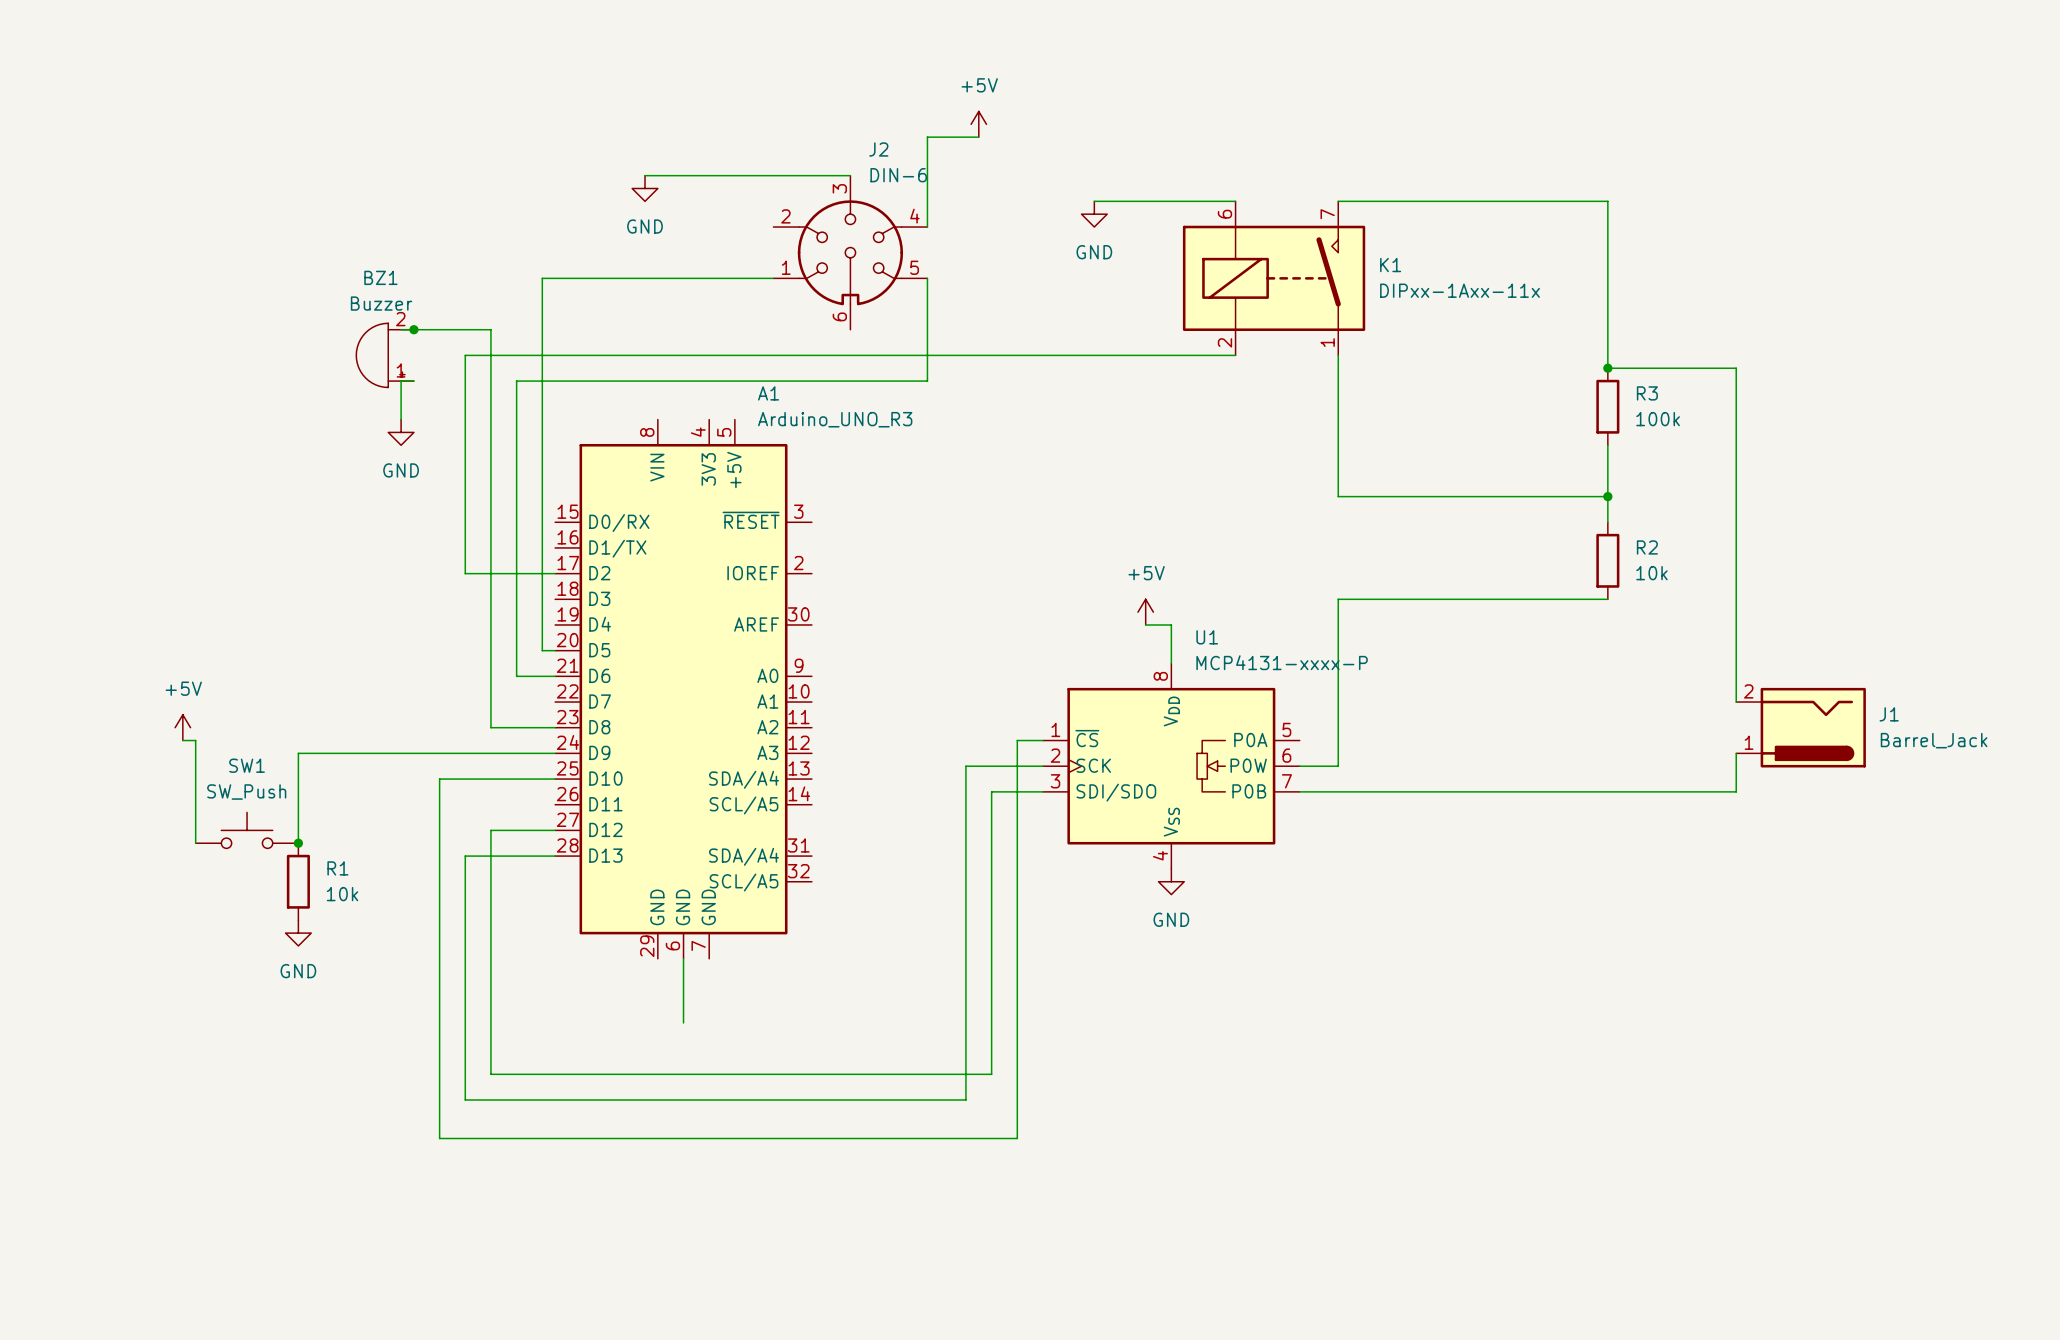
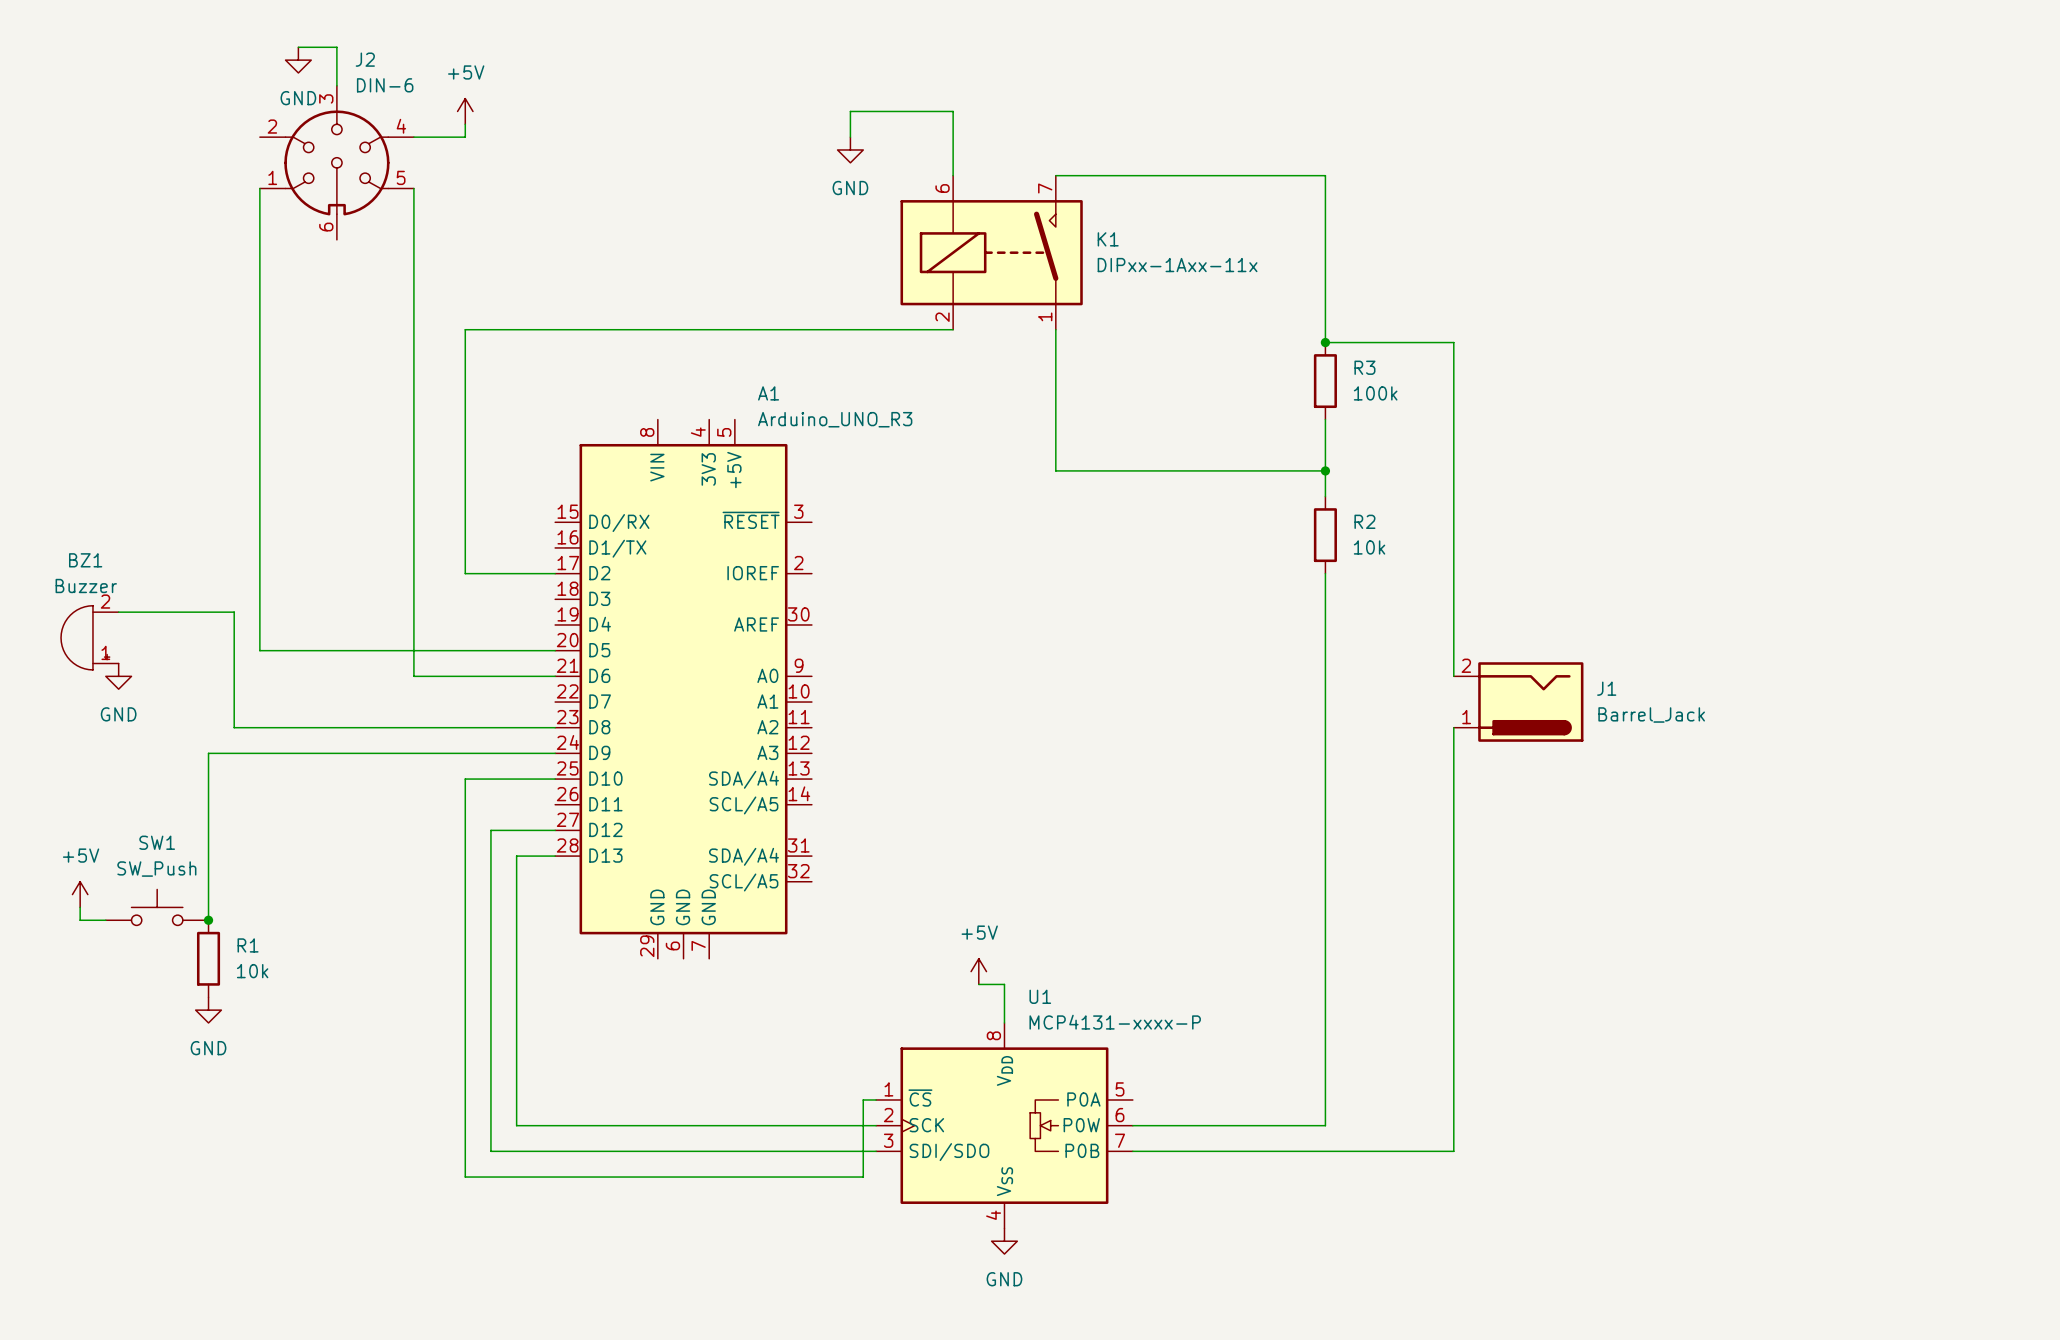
wire: none -> (298, 47) (336, 47) (336, 85)
power symbol: none -> GND (298, 60)
power symbol: none -> +5V (465, 111)
wire: none -> (465, 124) (465, 137) (413, 137)
power symbol: +5V (978, 124) -> none
wire: none -> (850, 137) (850, 111) (953, 111) (953, 175)
wire: (978, 137) (927, 137) (927, 227) -> none
power symbol: none -> GND (850, 149)
wire: (645, 175) (850, 175) -> none
wire: none -> (1055, 175) (1325, 175) (1325, 342) (1453, 342) (1453, 676)
power symbol: GND (645, 188) -> none
wire: (1094, 201) (1235, 201) -> none
wire: (1338, 201) (1607, 201) (1607, 368) (1736, 368) (1736, 702) -> none
power symbol: GND (1094, 214) -> none
J2 position: (850, 252) -> (336, 162)
wire: (773, 278) (542, 278) (542, 650) -> (259, 188) (259, 650) (542, 650)
wire: (927, 278) (927, 381) (516, 381) (516, 676) -> (413, 188) (413, 676) (516, 676)
K1 position: (1274, 278) -> (991, 252)
wire: (401, 329) (465, 329) -> (465, 355) (465, 329)
junction: (413, 329) -> none
wire: (490, 329) (490, 727) -> (118, 612) (234, 612) (234, 727) (490, 727)
wire: none -> (490, 329) (953, 329)
wire: none -> (1055, 329) (1055, 470) (1325, 470)
junction: none -> (1325, 342)
BZ1 position: (385, 355) -> (89, 637)
wire: (465, 355) (1235, 355) -> none
wire: (1338, 355) (1338, 496) (1607, 496) -> none
junction: (1607, 368) -> none
wire: (413, 381) (401, 381) (401, 419) -> none
R3 position: (1607, 406) -> (1325, 381)
wire: none -> (1325, 419) (1325, 496)
power symbol: GND (401, 432) -> none
wire: (1607, 445) (1607, 522) -> none
junction: none -> (1325, 470)
junction: (1607, 496) -> none
R2 position: (1607, 560) -> (1325, 535)
wire: none -> (1325, 573) (1325, 1125) (1132, 1125)
wire: (1607, 599) (1338, 599) (1338, 766) (1299, 766) -> none
power symbol: +5V (1145, 612) -> none
wire: (1145, 624) (1171, 624) (1171, 663) -> none
power symbol: none -> GND (118, 676)
power symbol position: +5V (182, 727) -> +5V (80, 894)
wire: none -> (1453, 727) (1453, 1151) (1132, 1151)
J1 position: (1801, 727) -> (1518, 702)
wire: (182, 740) (195, 740) (195, 843) -> none
wire: (1042, 740) (1017, 740) (1017, 1138) (439, 1138) (439, 779) (465, 779) -> none
wire: (298, 753) (298, 843) -> (298, 753) (208, 753) (208, 920)
wire: (1736, 753) (1736, 791) (1299, 791) -> none
wire: (1042, 766) (965, 766) (965, 1099) (876, 1099) -> none
U1 position: (1171, 766) -> (1004, 1125)
wire: (1042, 791) (991, 791) (991, 1074) (490, 1074) -> (876, 1151) (490, 1151) (490, 1074)
SW1 position: (247, 830) -> (157, 907)
junction: (298, 843) -> none
wire: (465, 856) (516, 856) -> (465, 856) (465, 779)
wire: none -> (516, 856) (516, 1125) (876, 1125)
R1 position: (298, 881) -> (208, 958)
power symbol: GND (1171, 881) -> none
wire: none -> (80, 907) (80, 920) (105, 920)
junction: none -> (208, 920)
power symbol position: GND (298, 933) -> GND (208, 1010)
wire: (683, 958) (683, 1022) -> none
power symbol: none -> +5V (978, 971)
wire: none -> (978, 984) (1004, 984) (1004, 1022)
wire: (465, 1099) (863, 1099) -> (465, 1099) (465, 1177) (863, 1177) (863, 1099)
power symbol: none -> GND (1004, 1241)

